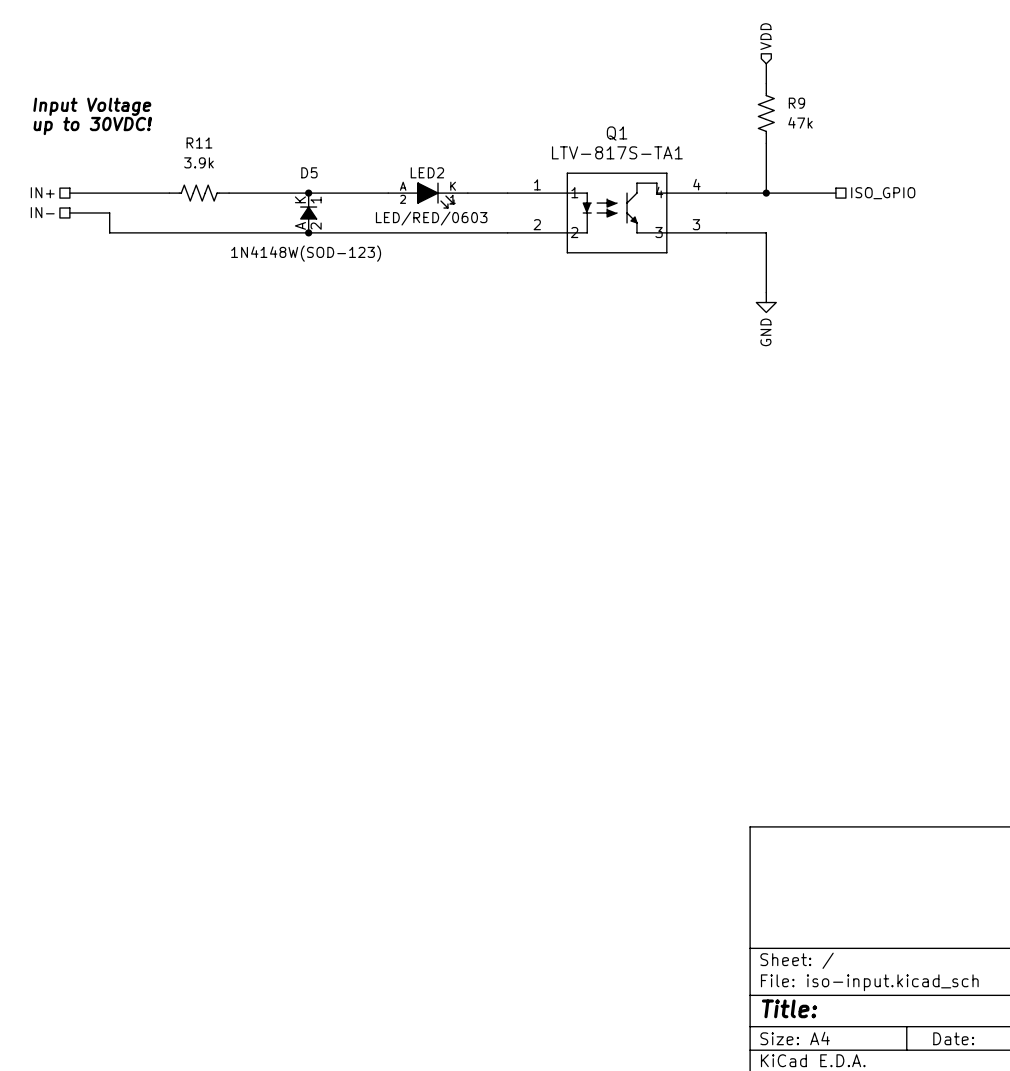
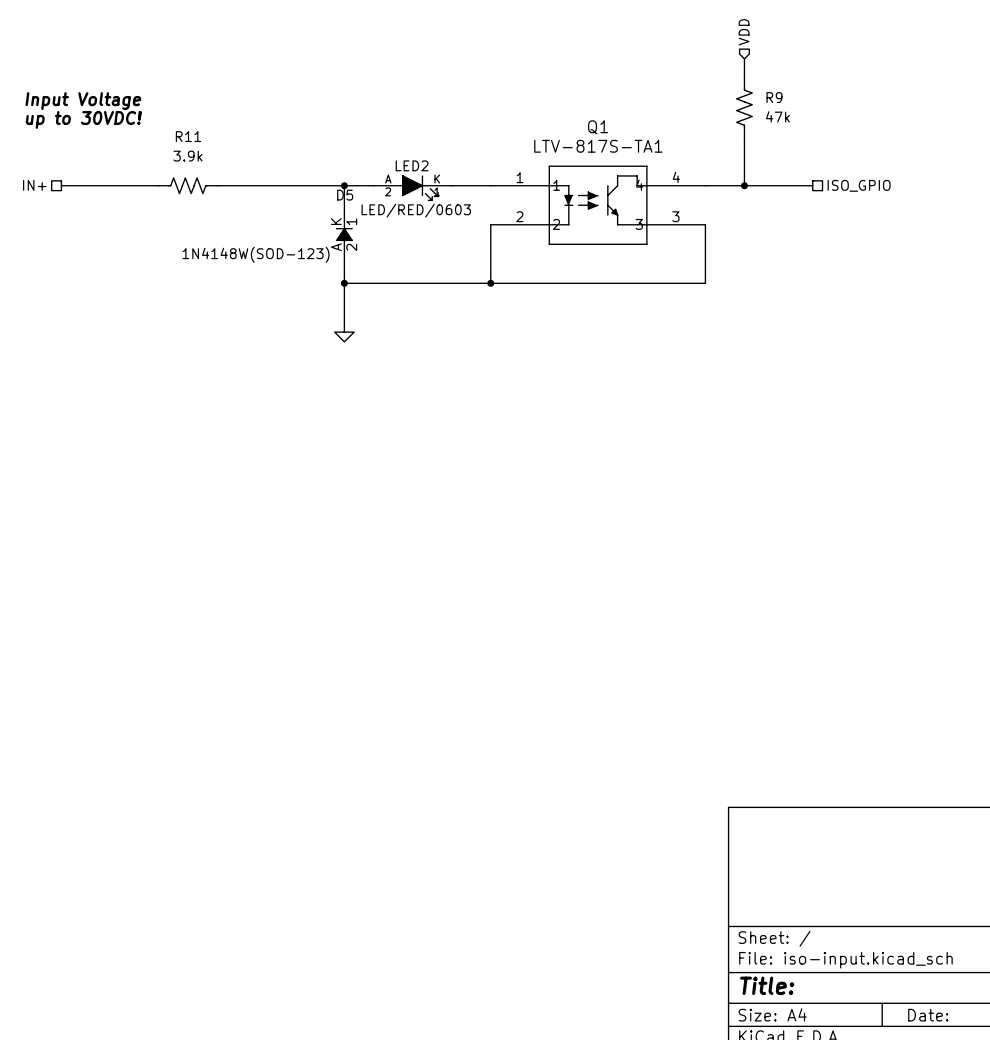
junction: (308, 193) -> none
wire: none -> (344, 185) (344, 215)
junction: none -> (344, 185)
hierarchical label: IN- (42, 212) -> none
wire: (69, 212) (109, 212) (109, 232) (507, 232) -> (490, 283) (490, 224)
D5 position: (308, 212) -> (344, 234)
junction: (308, 232) -> none
wire: (726, 232) (766, 232) (766, 292) -> (705, 224) (705, 283) (344, 283)
D5 value position: 1N4148W(SOD-123) (306, 253) -> 1N4148W(SOD-123) (256, 254)
wire: none -> (344, 254) (344, 322)
junction: none -> (344, 283)
junction: none -> (490, 283)
power symbol: GND (766, 302) -> none
power symbol: none -> (344, 332)

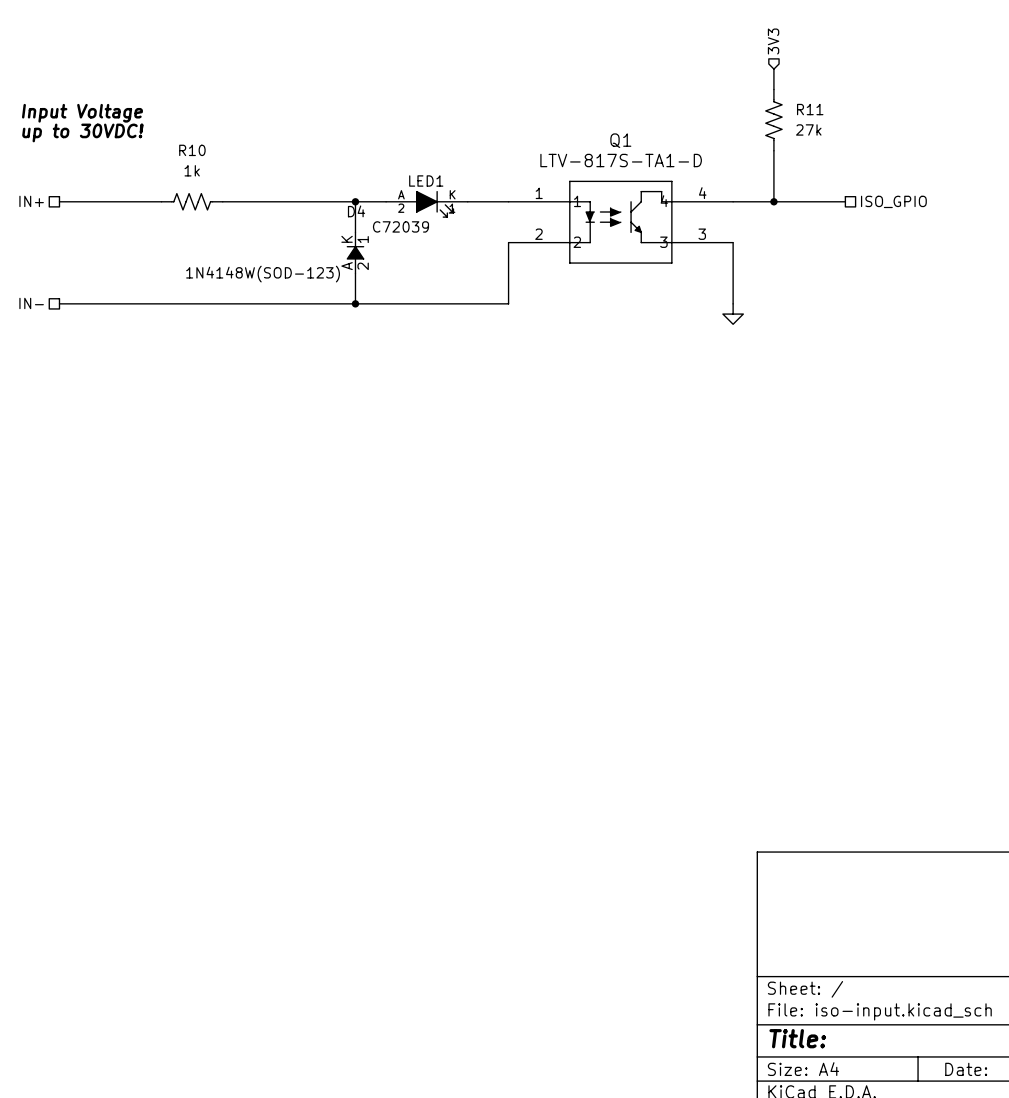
hierarchical label: VDD (744, 32) -> 3V3 (773, 41)
R9 name: R9 (774, 97) -> R11 (810, 109)
R9 value: 47k (777, 116) -> 27k (808, 129)
R11 name: R11 (188, 136) -> R10 (192, 150)
Q1 value: LTV-817S-TA1 (598, 146) -> LTV-817S-TA1-D (621, 160)
R11 value: 3.9k (188, 156) -> 1k (192, 170)
LED2 name: LED2 (412, 165) -> LED1 (426, 181)
D5 name: D5 (345, 195) -> D4 (356, 211)
LED2 value: LED/RED/0603 (416, 210) -> C72039 (400, 226)
hierarchical label: none -> IN- (31, 303)
wire: (344, 283) (344, 322) -> (355, 303) (59, 303)
wire: (490, 283) (705, 283) -> none
junction: (490, 283) -> none
power symbol: none -> (733, 314)
power symbol: (344, 332) -> none

